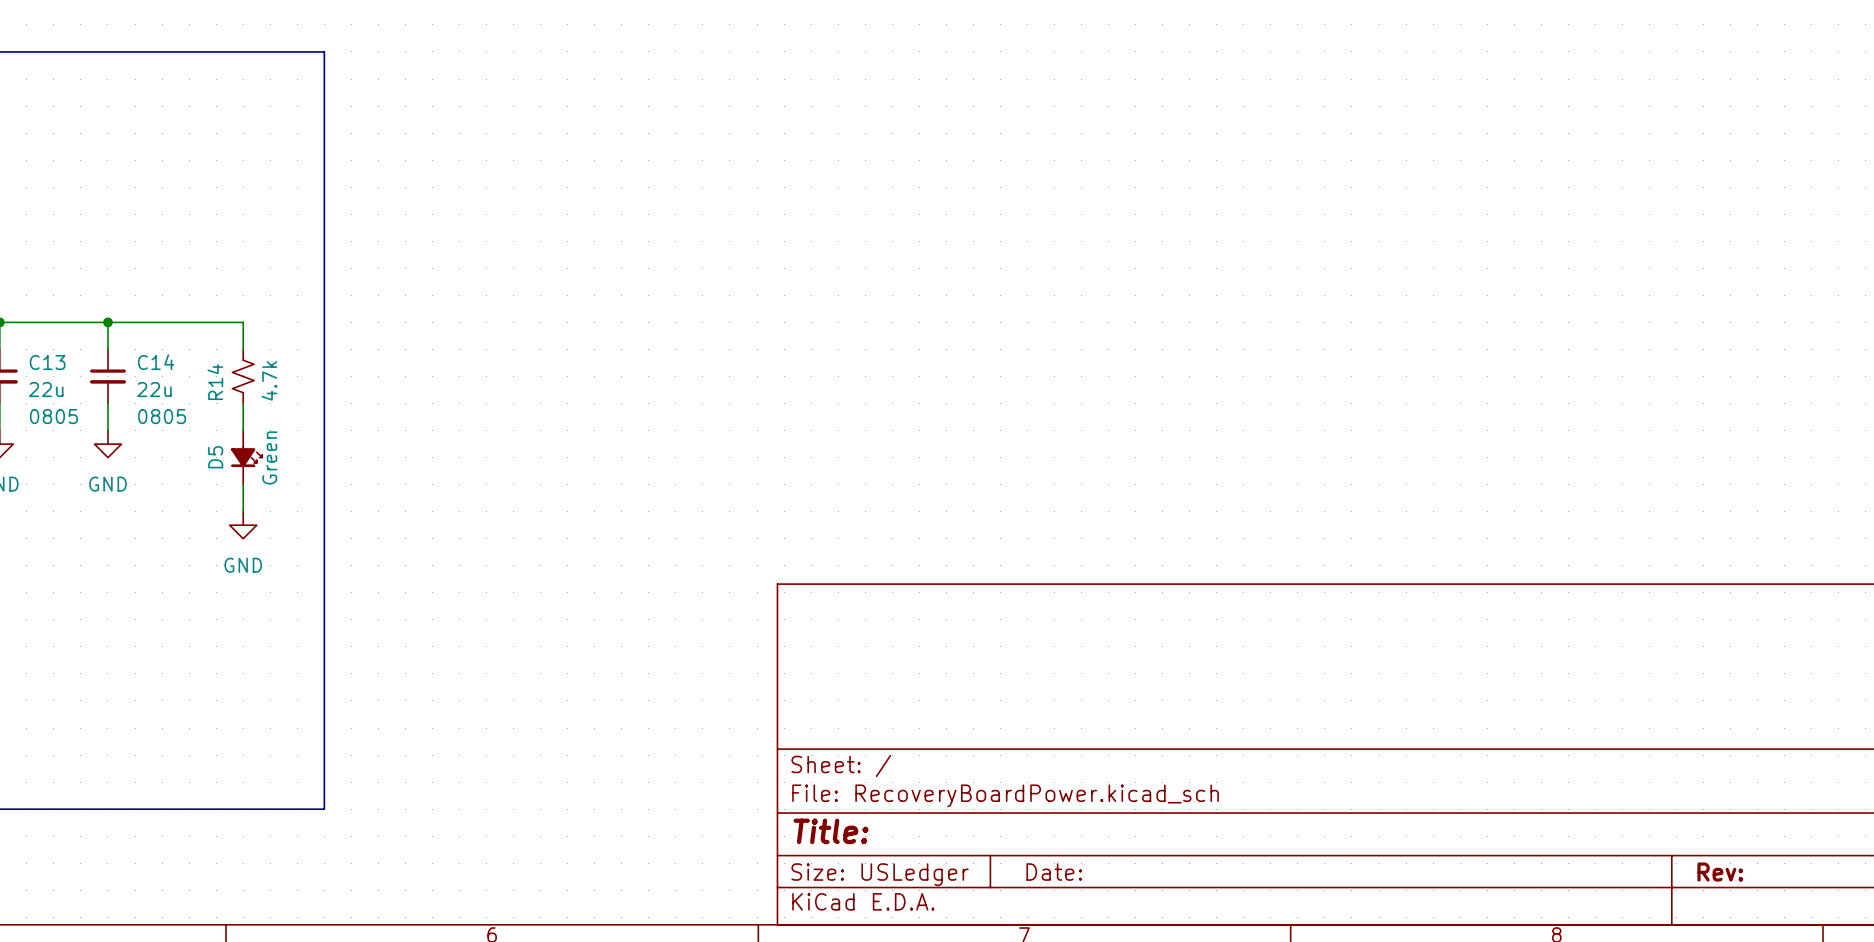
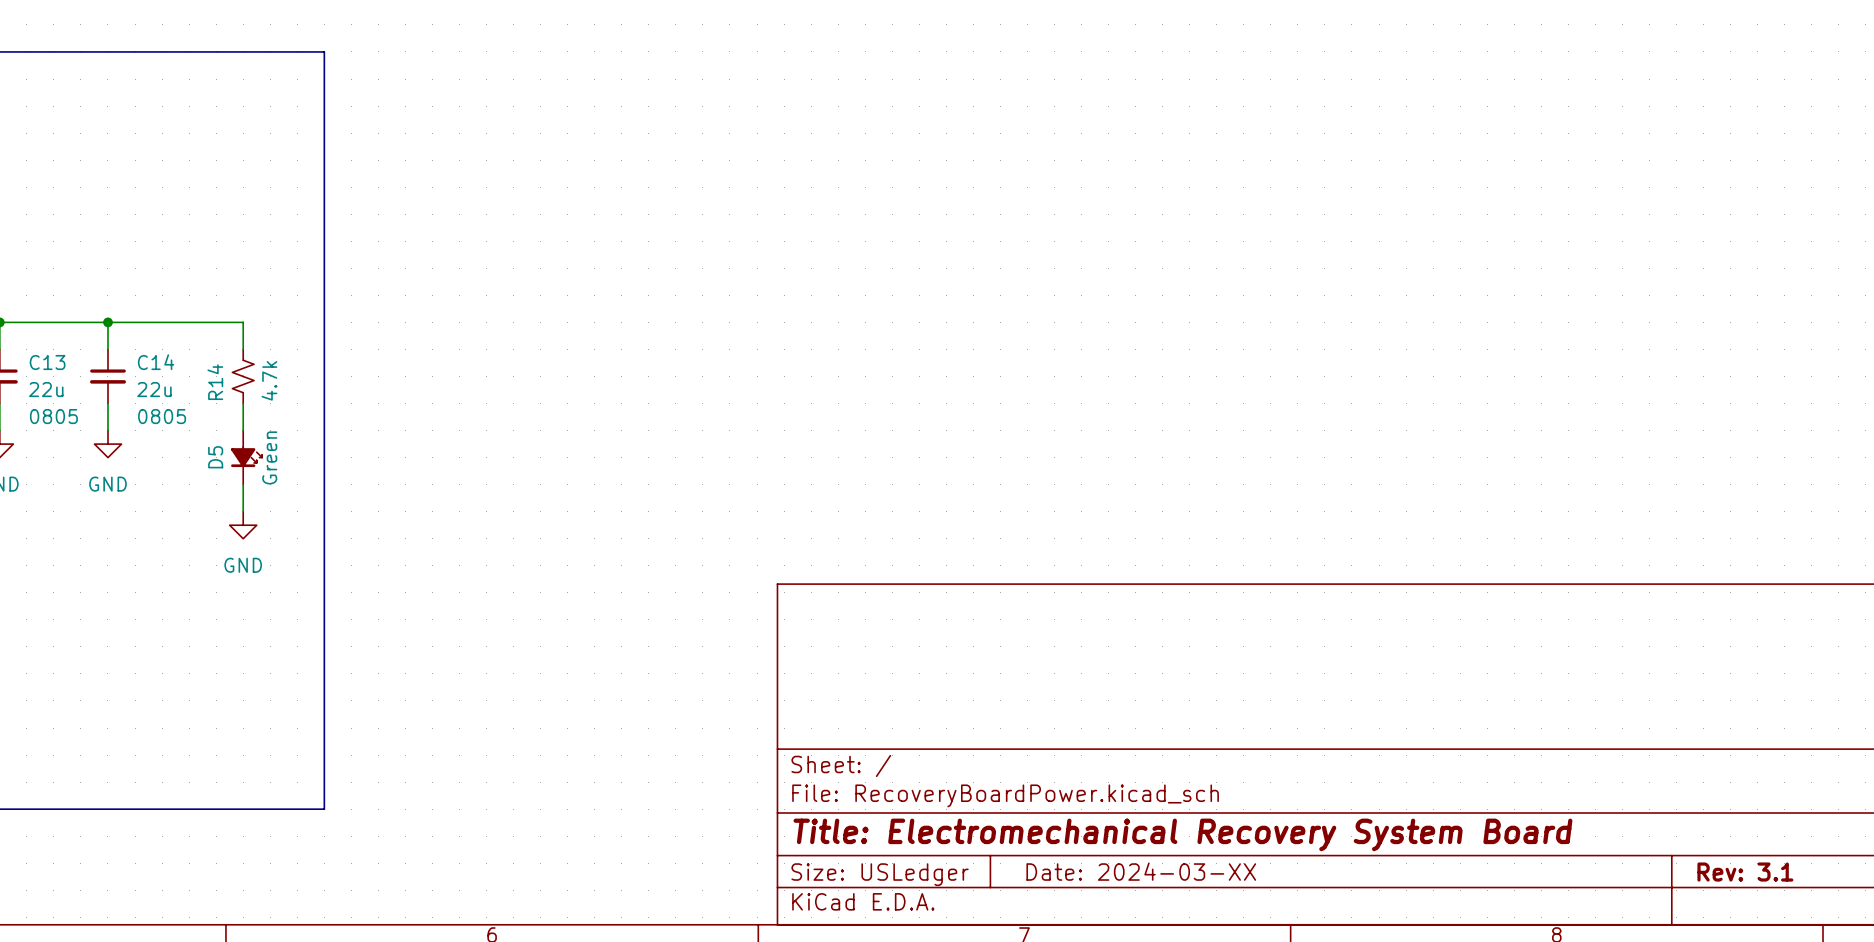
title block: Title: (831, 831) -> Title: Electromechanical Recovery System Board (1182, 834)
title block: Date: (1054, 872) -> Date: 2024-03-XX (1141, 871)
title block: Rev: (1720, 872) -> Rev: 3.1 (1745, 872)

